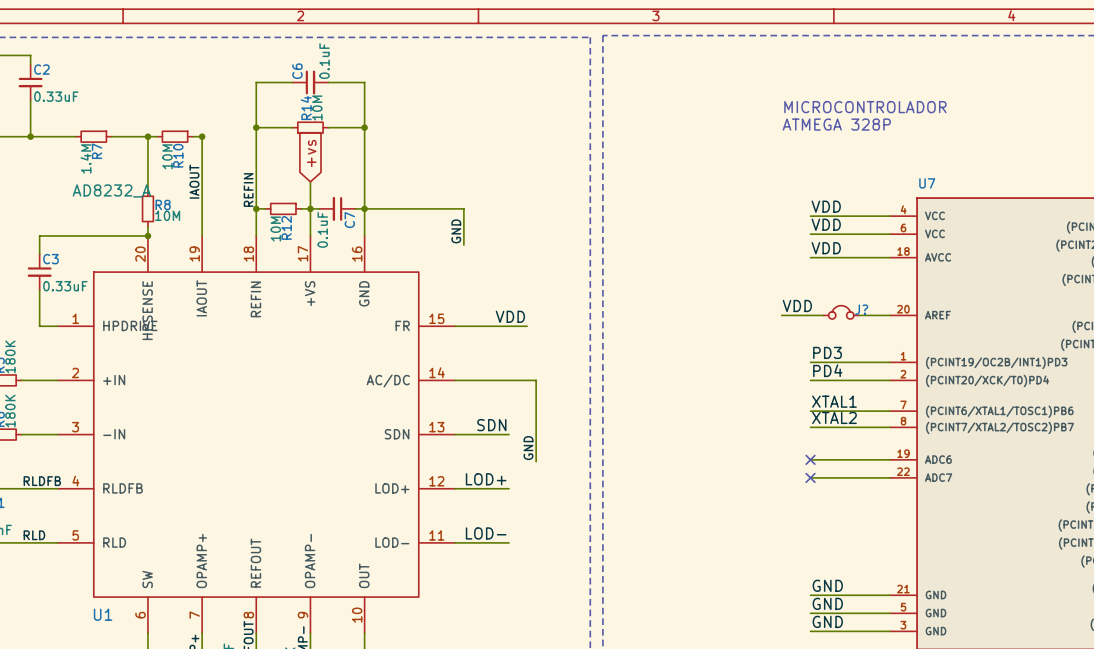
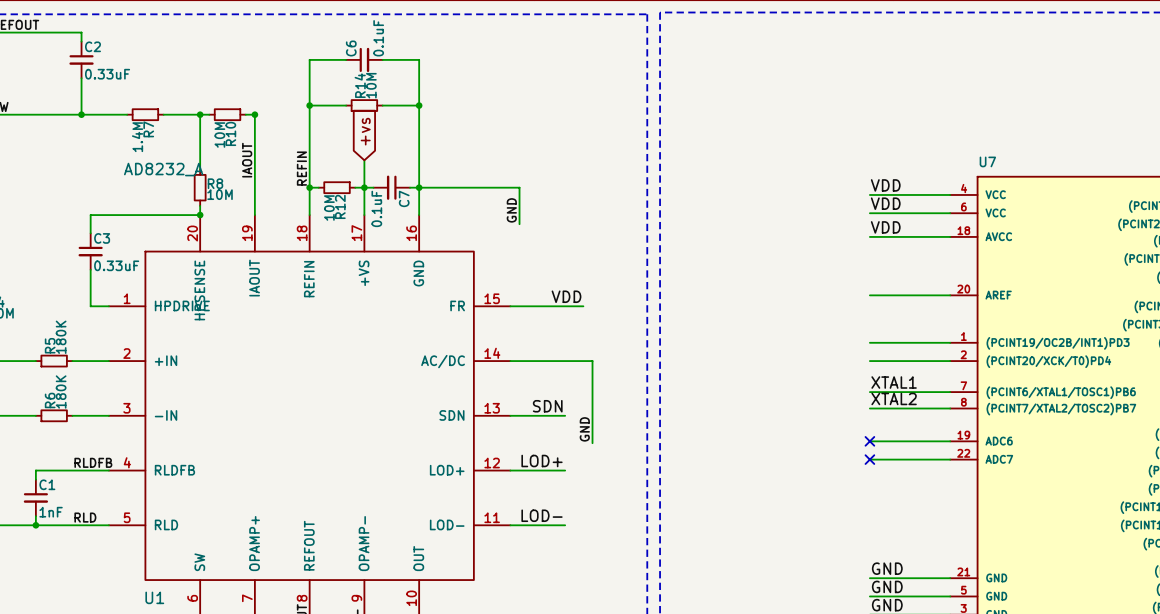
text: MICROCONTROLADOR (865, 107) -> none
text: ATMEGA 328P (836, 124) -> none
label: VDD (797, 305) -> none
J?: (841, 312) -> none
wire: (781, 315) (810, 315) -> none
wire: none -> (882, 295) (919, 295)
label: PD3 (827, 352) -> none
label: PD4 (827, 370) -> none

